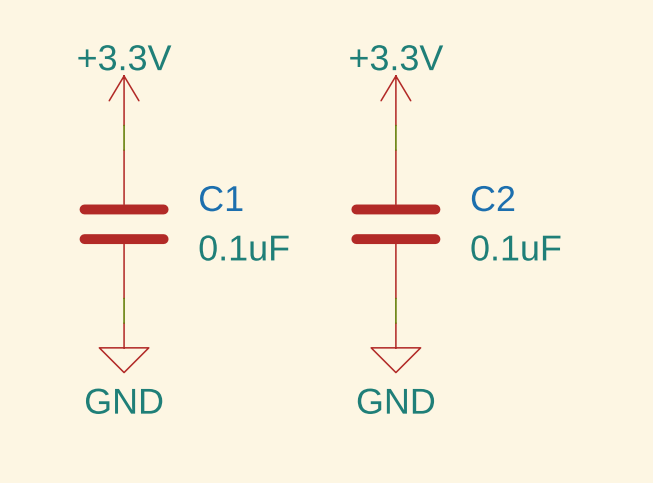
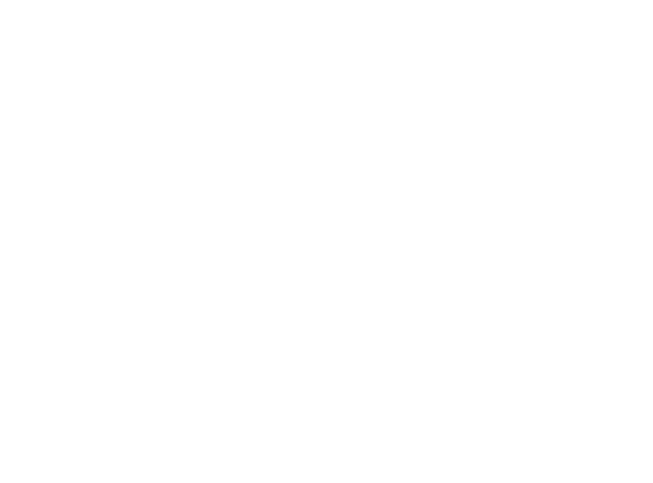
power symbol: +3.3V (124, 100) -> none
power symbol: +3.3V (395, 100) -> none
wire: (124, 125) (124, 150) -> none
wire: (395, 125) (395, 150) -> none
C1: 0.1uF (124, 224) -> none
C2: 0.1uF (395, 224) -> none
wire: (124, 298) (124, 323) -> none
wire: (395, 298) (395, 323) -> none
power symbol: GND (124, 347) -> none
power symbol: GND (395, 347) -> none

